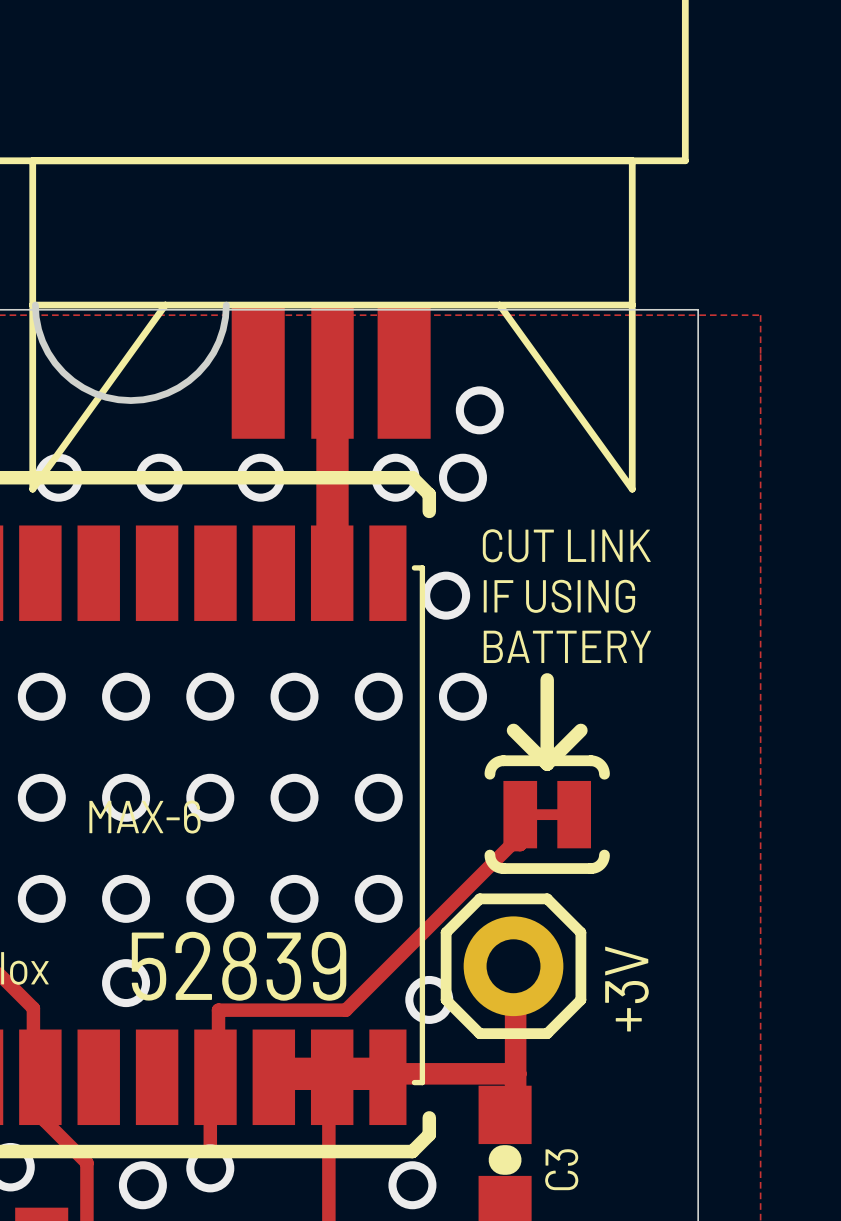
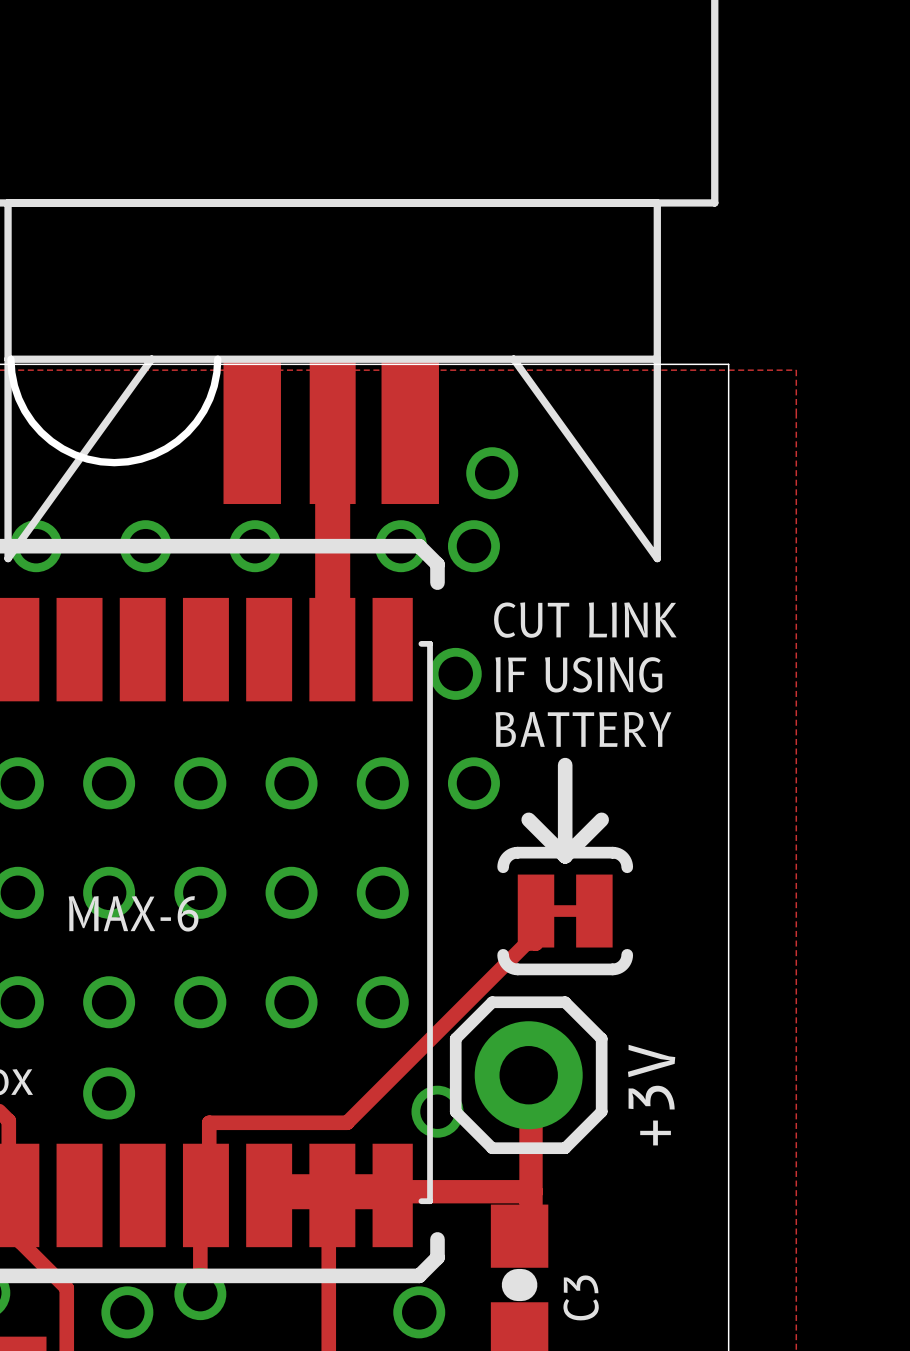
text: 52839 (239, 966) -> none

